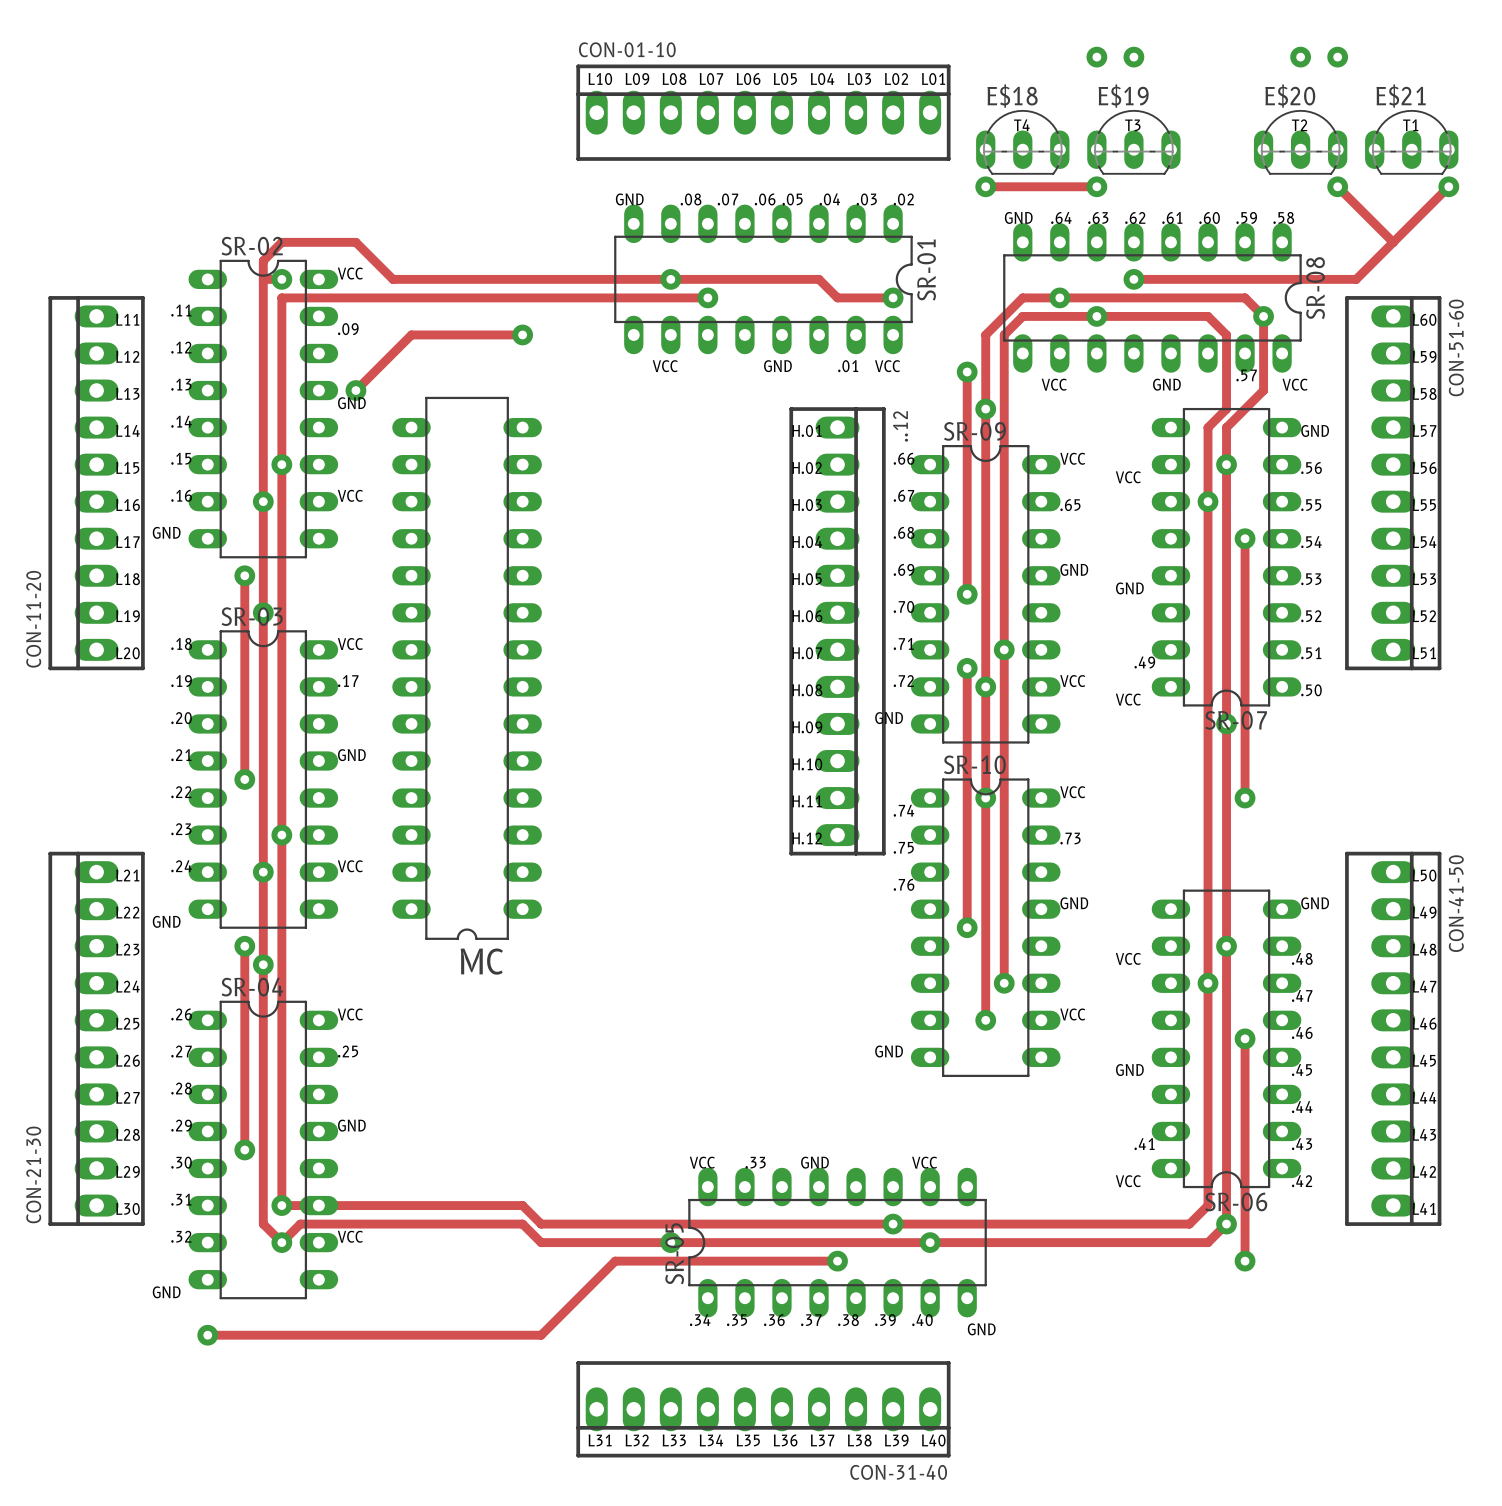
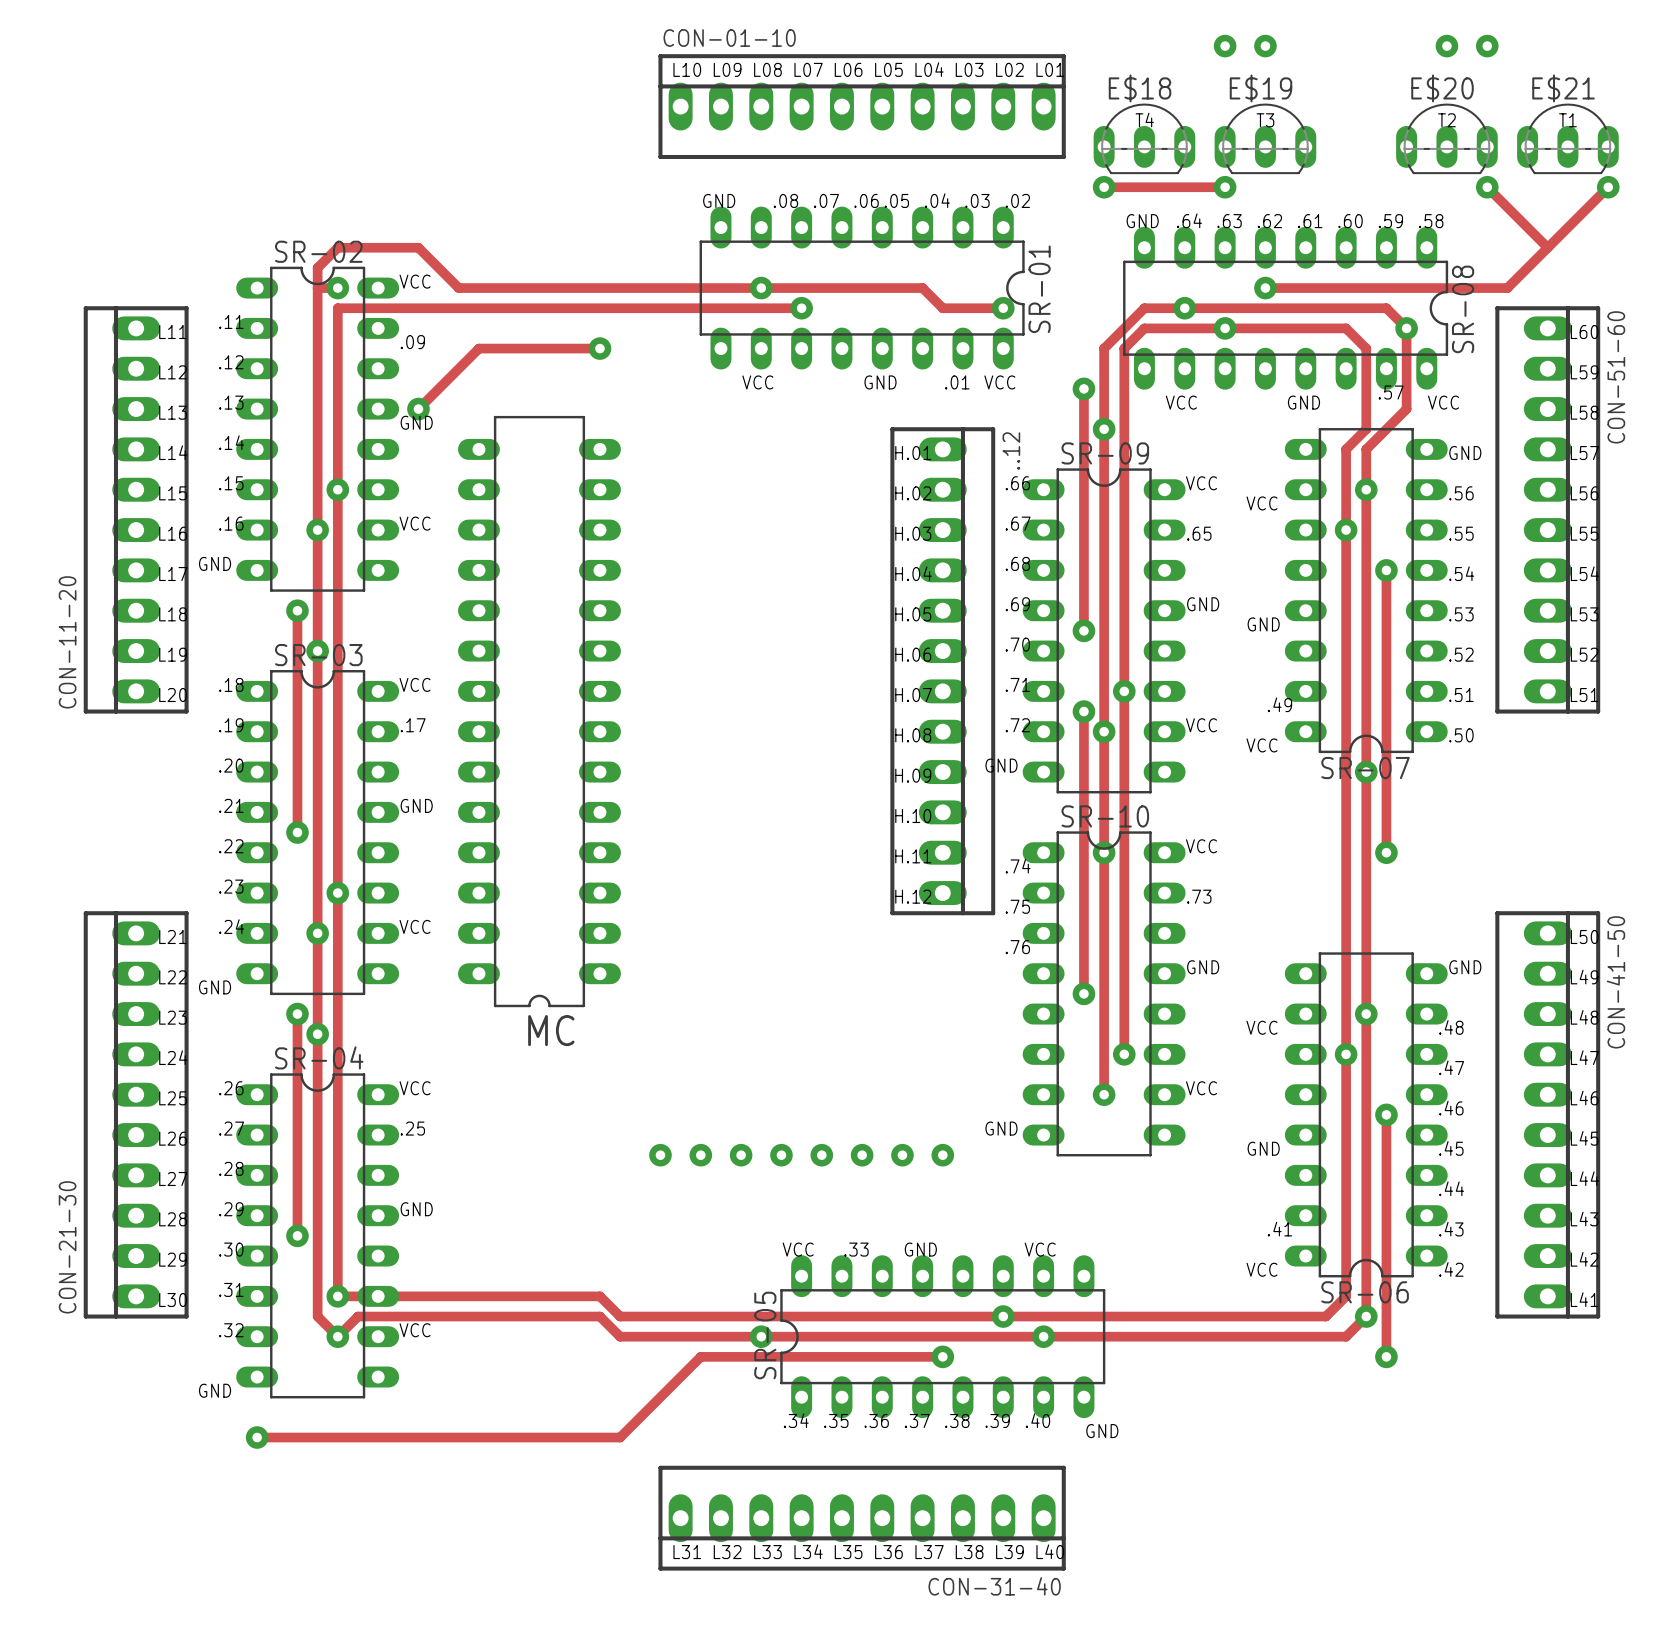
via: none -> (660, 1155)
via: none -> (700, 1155)
via: none -> (741, 1155)
via: none -> (781, 1155)
via: none -> (821, 1155)
via: none -> (862, 1155)
via: none -> (902, 1155)
via: none -> (942, 1155)

